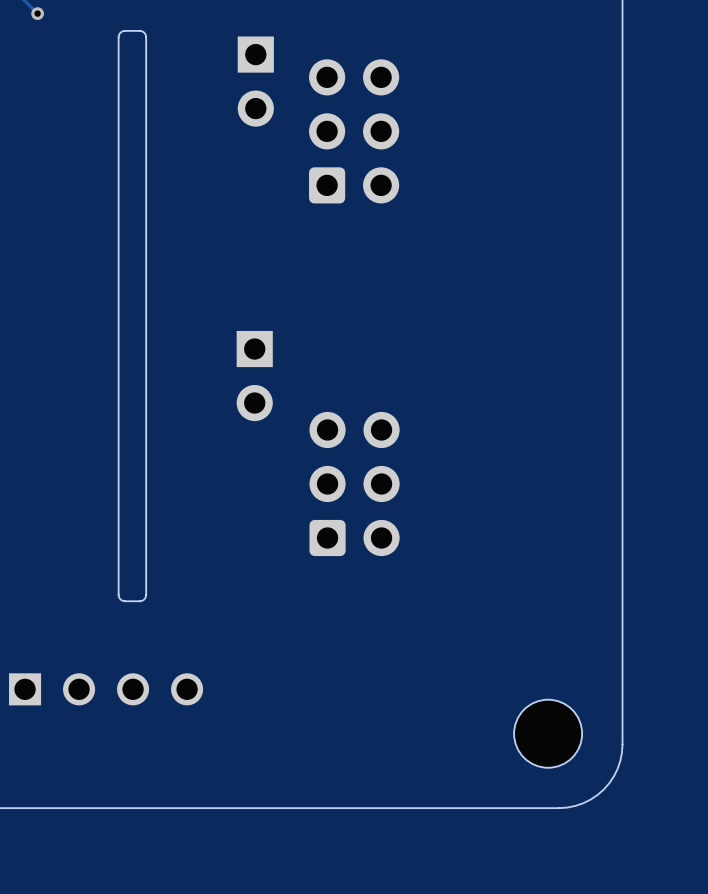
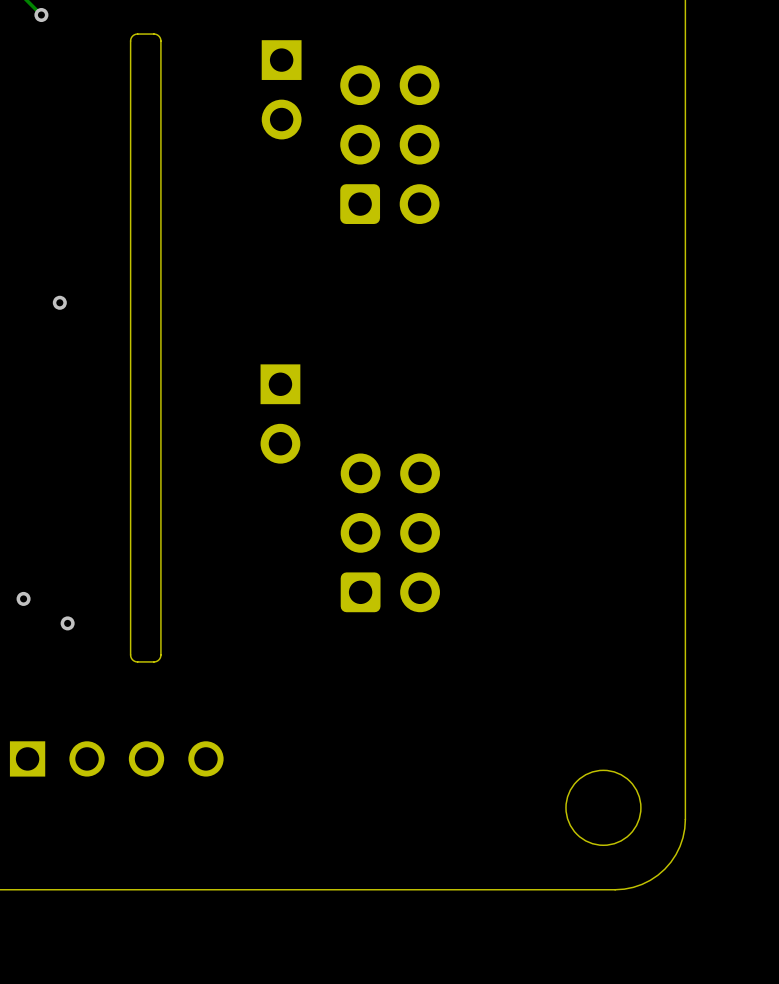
via: none -> (59, 302)
via: none -> (23, 598)
via: none -> (67, 623)

